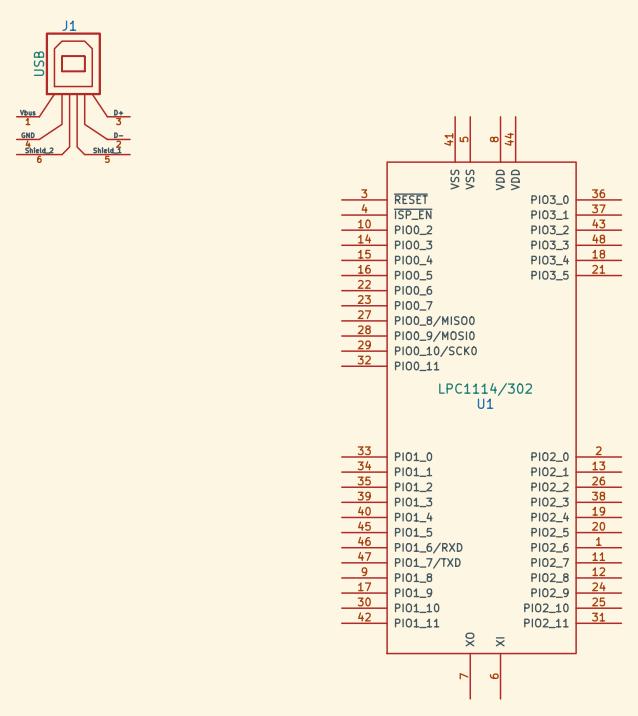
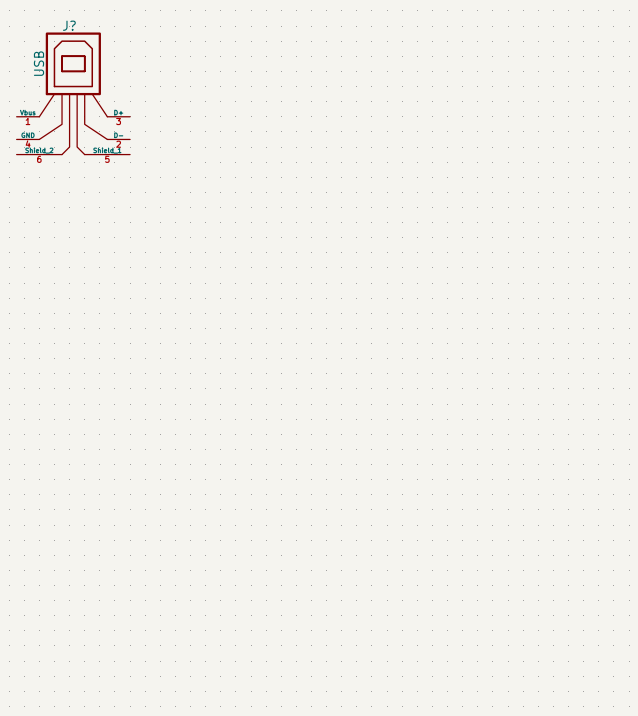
J1 name: J1 (69, 25) -> J? (69, 25)
U1: LPC1114/302 (481, 407) -> none

